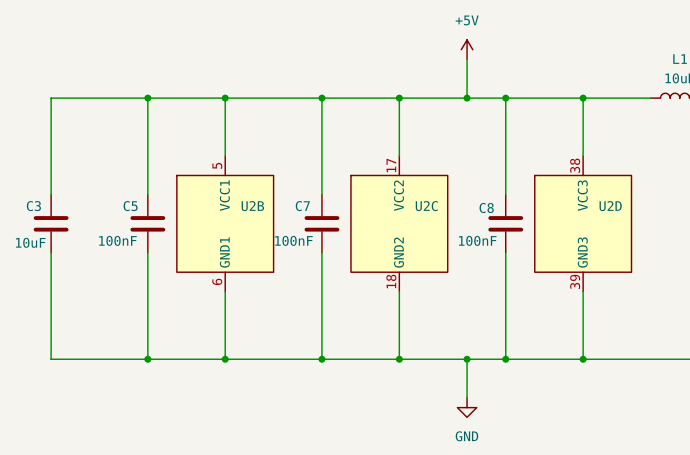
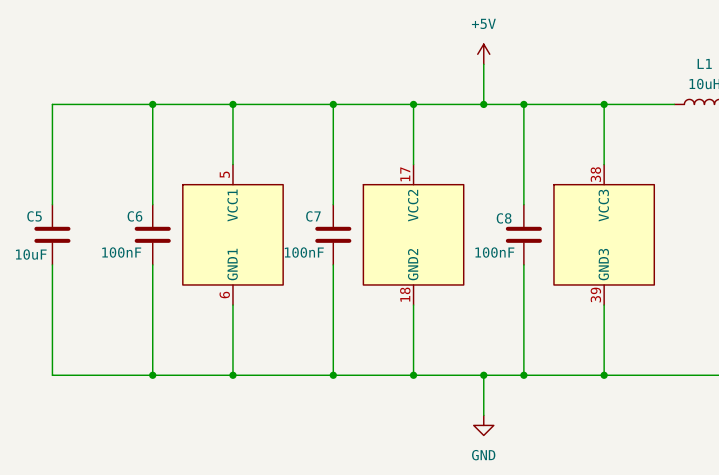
C3 name: C3 (33, 206) -> C5 (34, 216)
C5 name: C5 (130, 206) -> C6 (134, 216)
U2B name: U2B (252, 206) -> none
U2C name: U2C (426, 206) -> none
U2D name: U2D (610, 206) -> none

